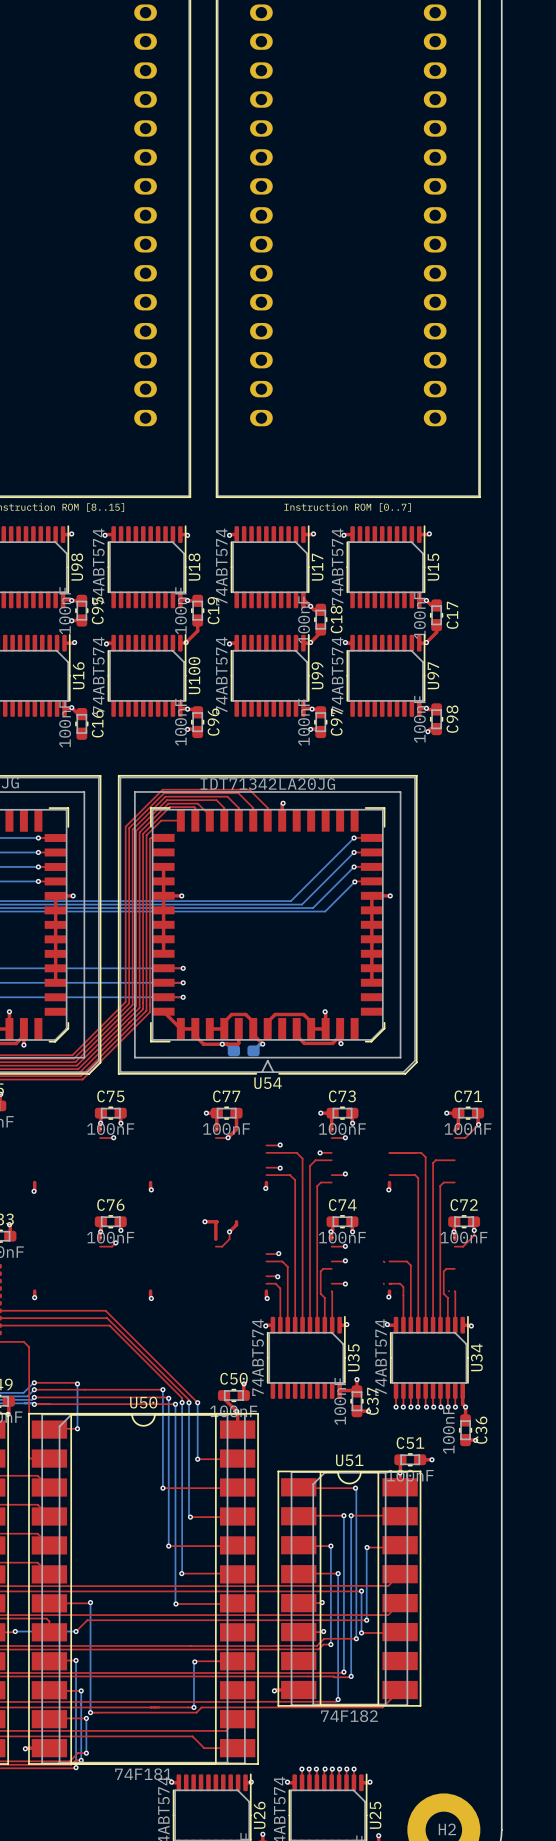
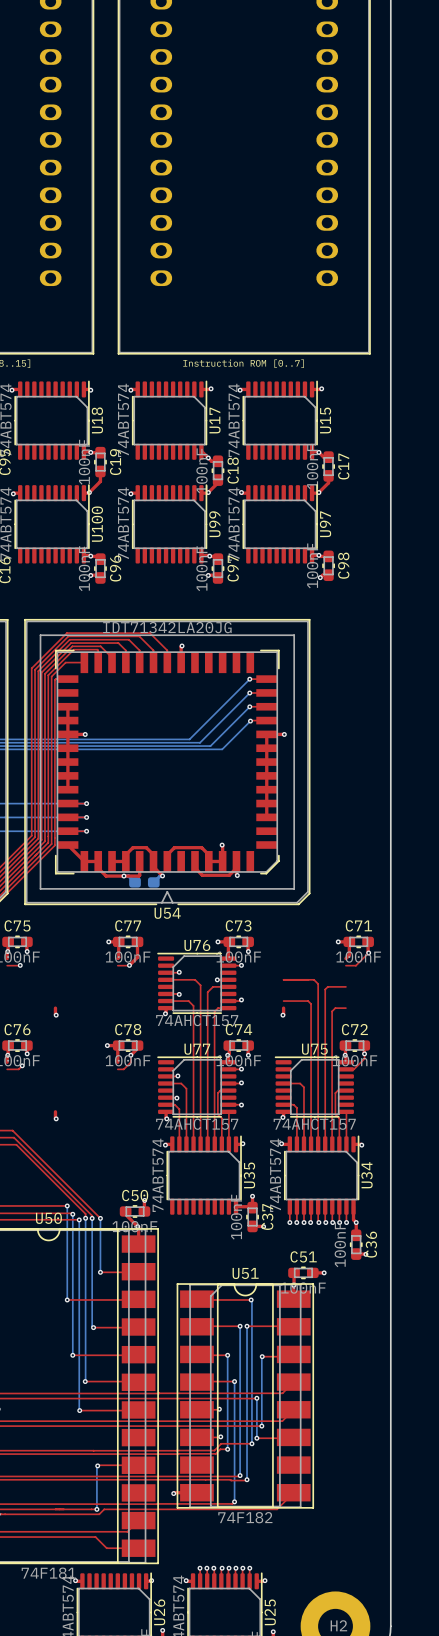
U76: none -> 74AHCT157 (196, 983)
C78: none -> 100nF (128, 1045)
U77: none -> 74AHCT157 (196, 1087)
U75: none -> 74AHCT157 (314, 1087)

